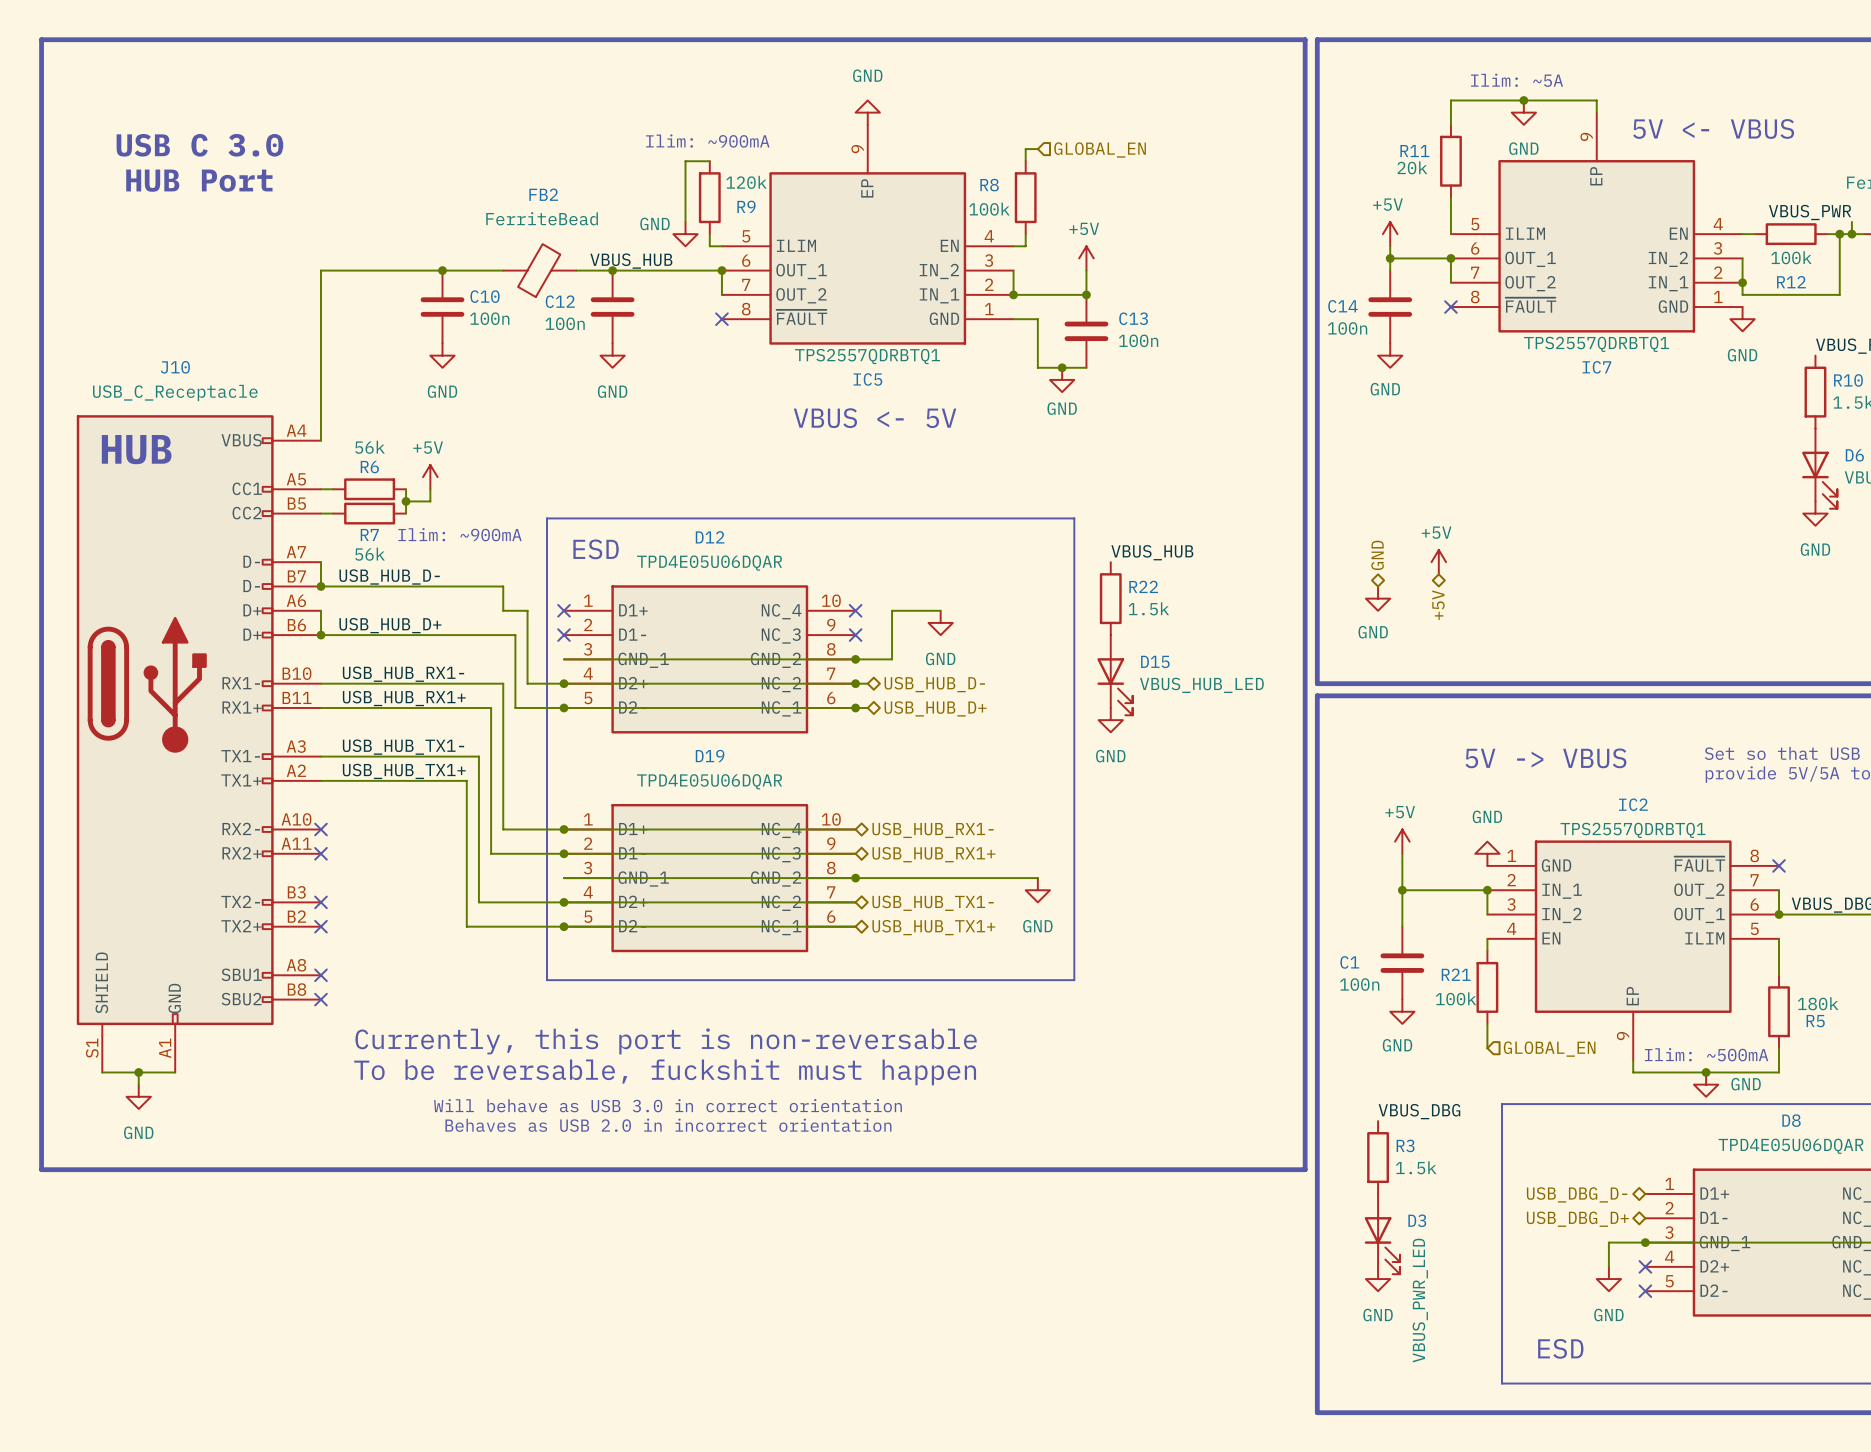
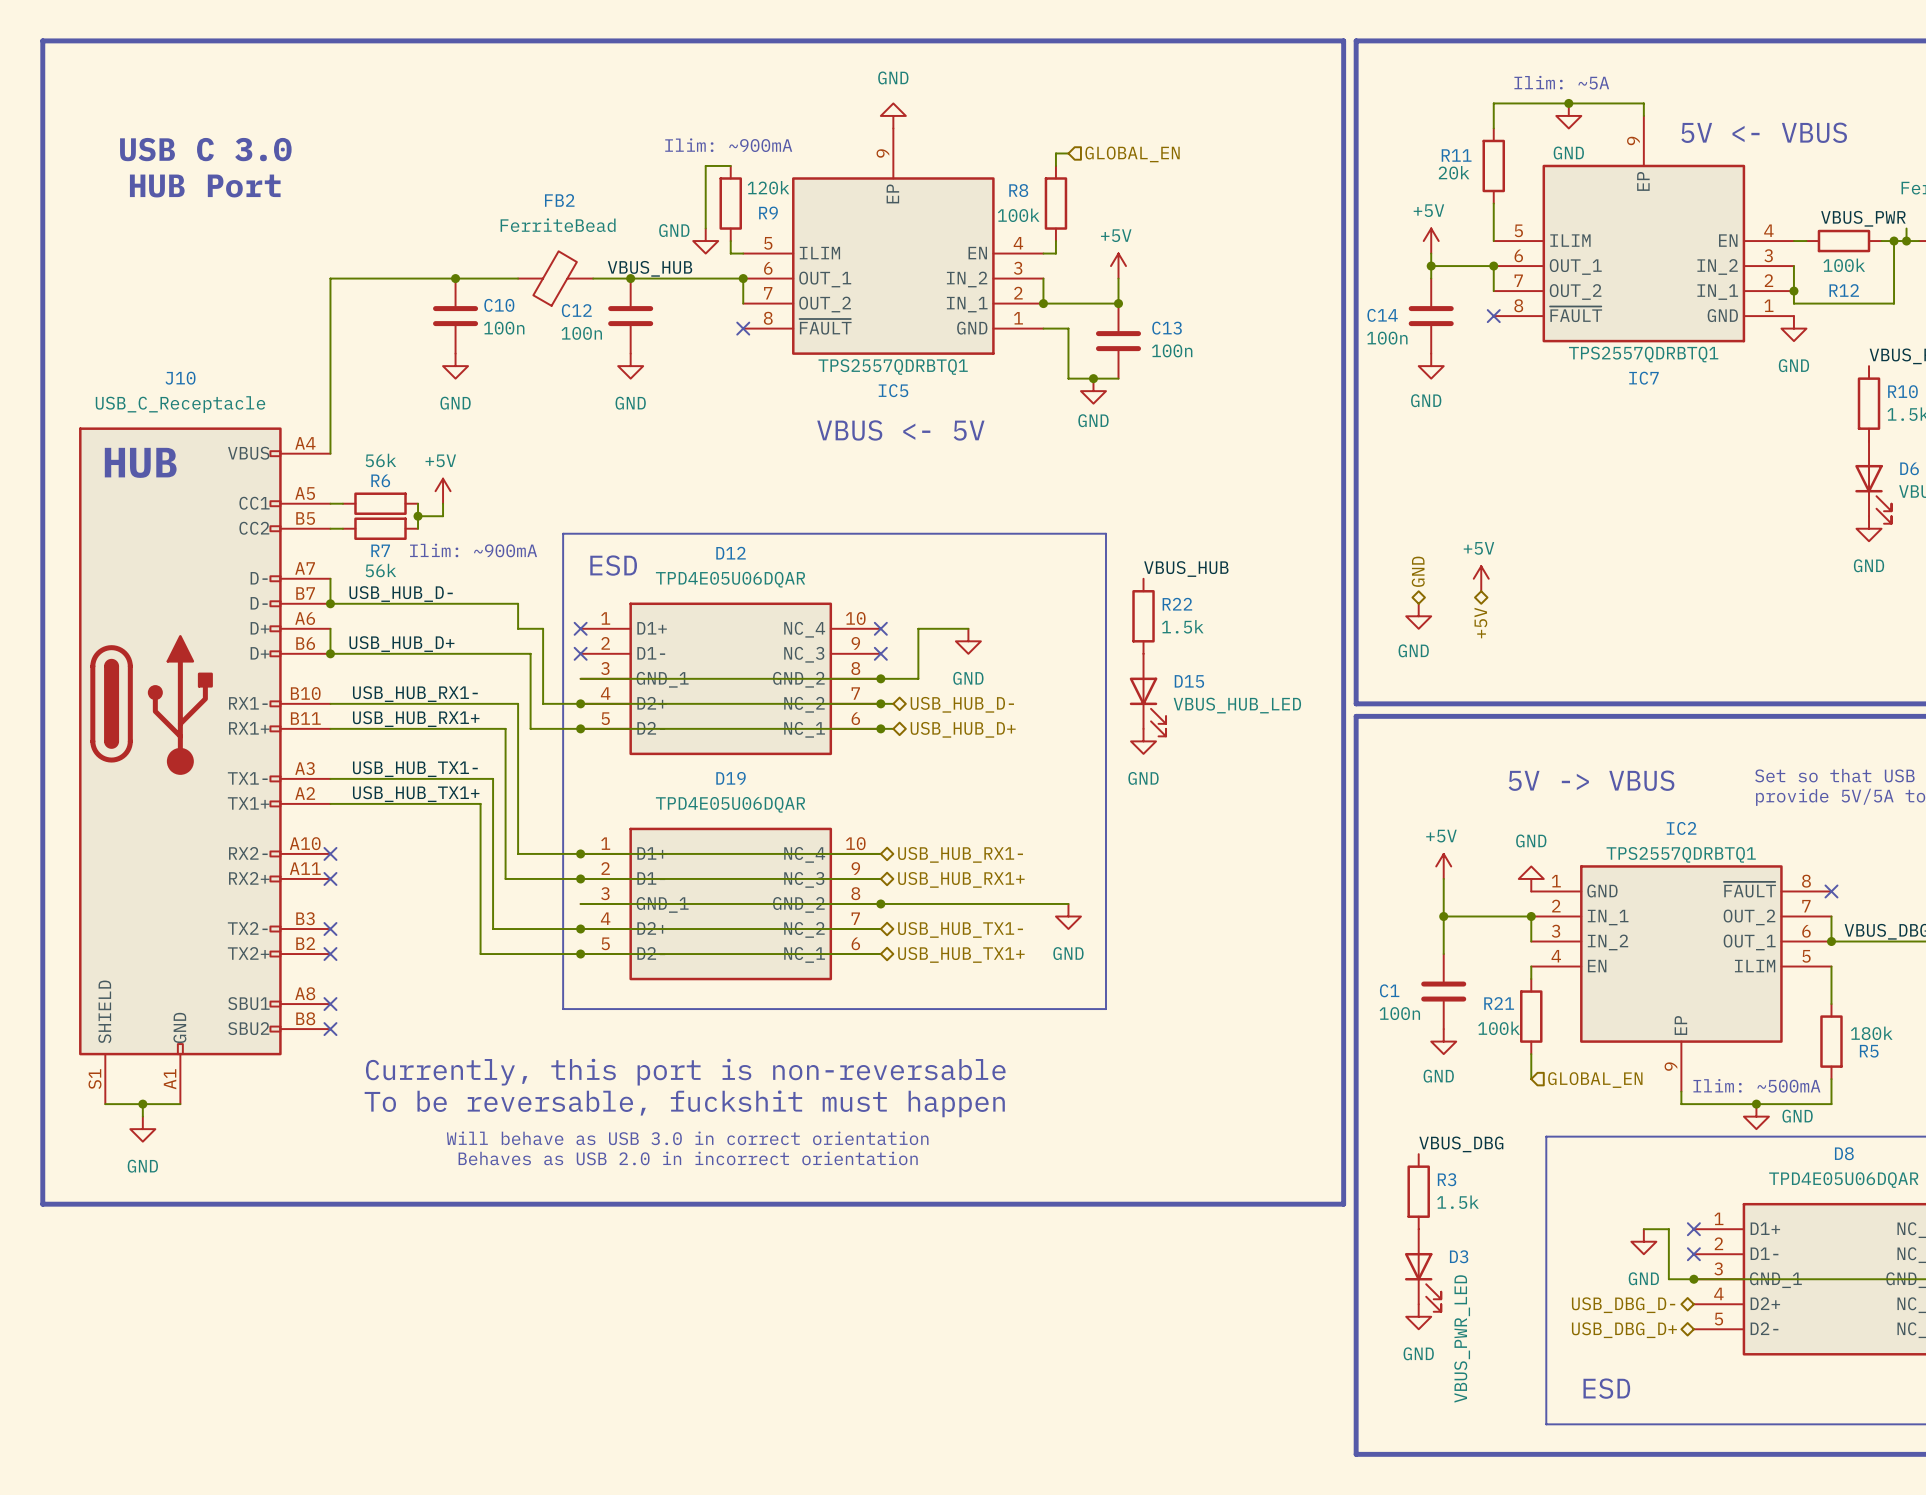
no-connect mark: none -> (1693, 1229)
hierarchical label position: USB_DBG_D- (1577, 1194) -> USB_DBG_D- (1623, 1305)
no-connect mark: none -> (1693, 1254)
hierarchical label position: USB_DBG_D+ (1577, 1219) -> USB_DBG_D+ (1624, 1330)
wire: (1621, 1242) (1608, 1242) (1608, 1266) -> (1668, 1279) (1668, 1229) (1643, 1229)
no-connect mark: (1645, 1266) -> none
power symbol position: GND (1608, 1279) -> GND (1643, 1241)
no-connect mark: (1645, 1291) -> none

